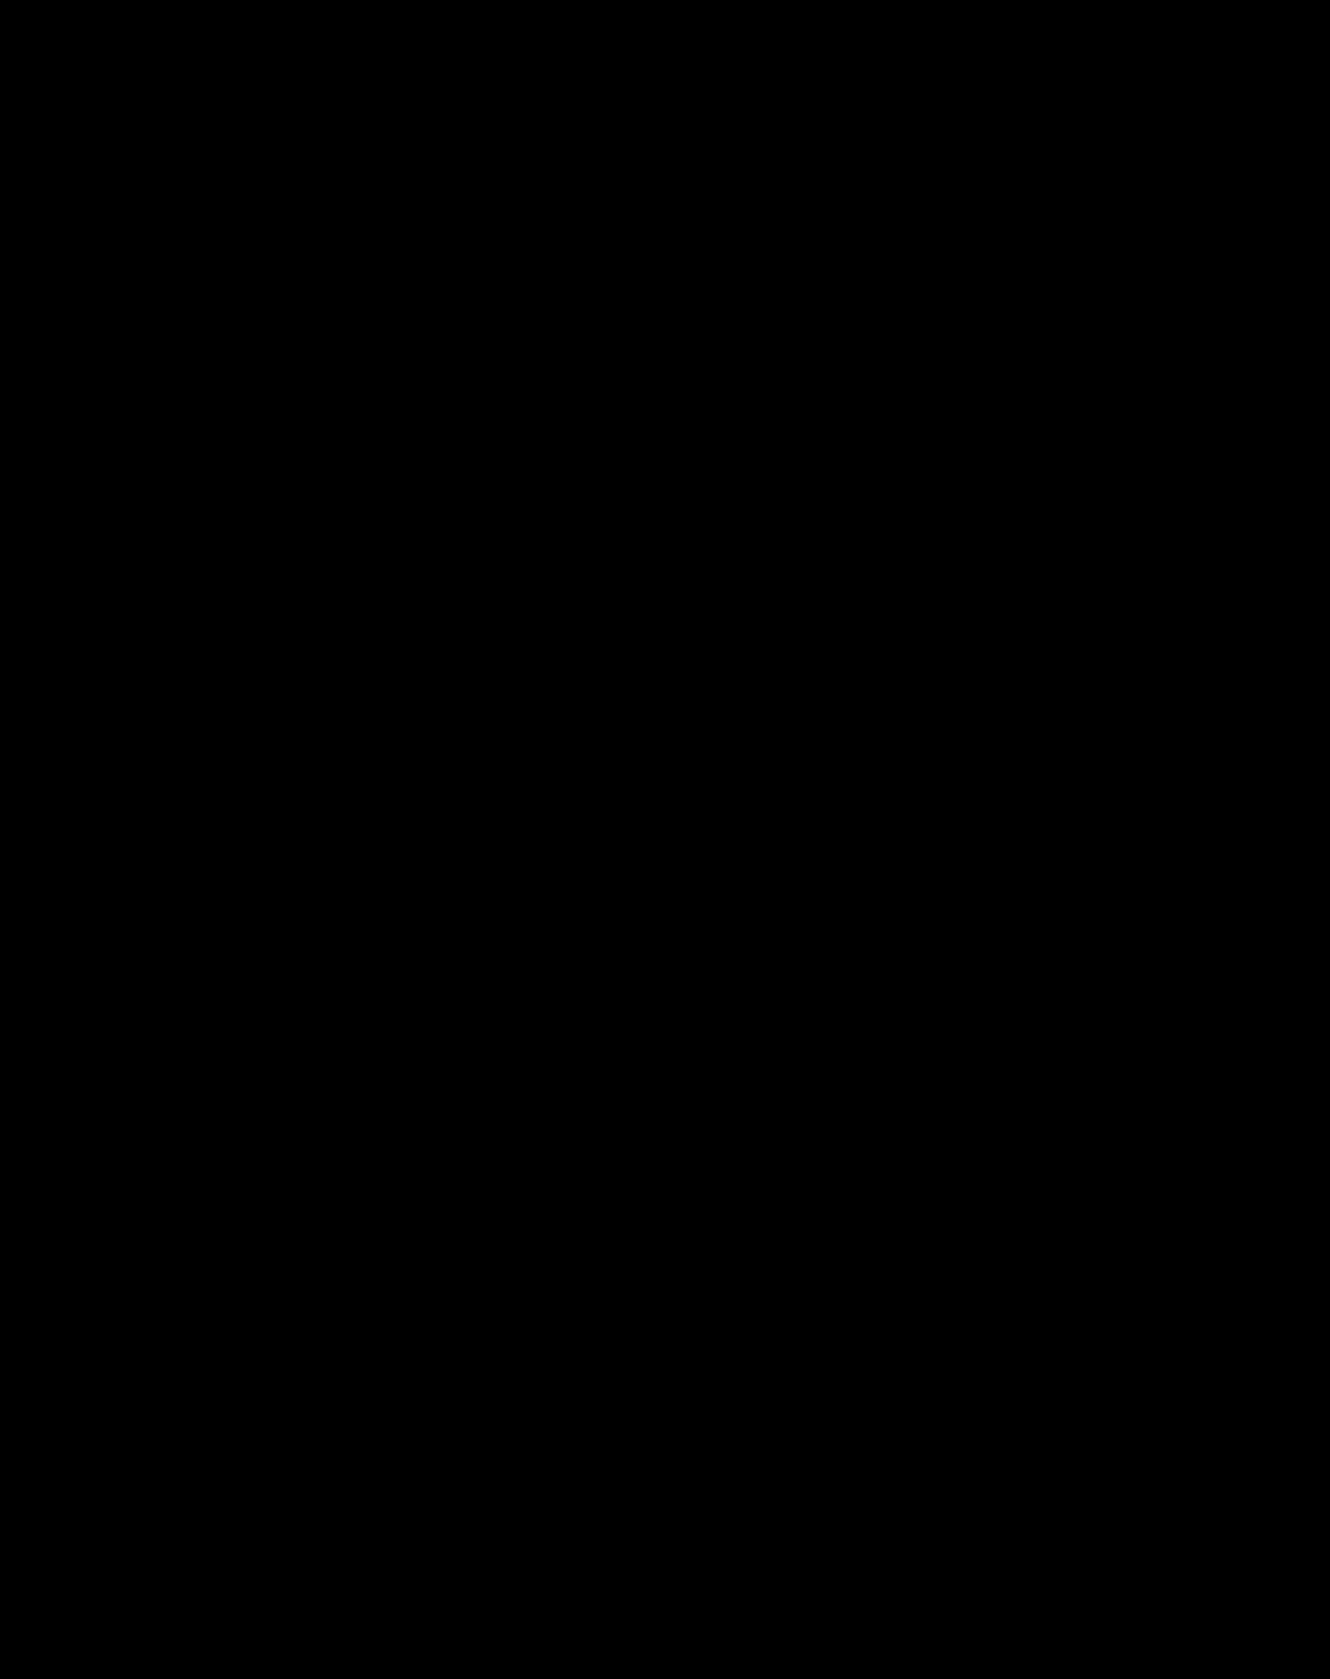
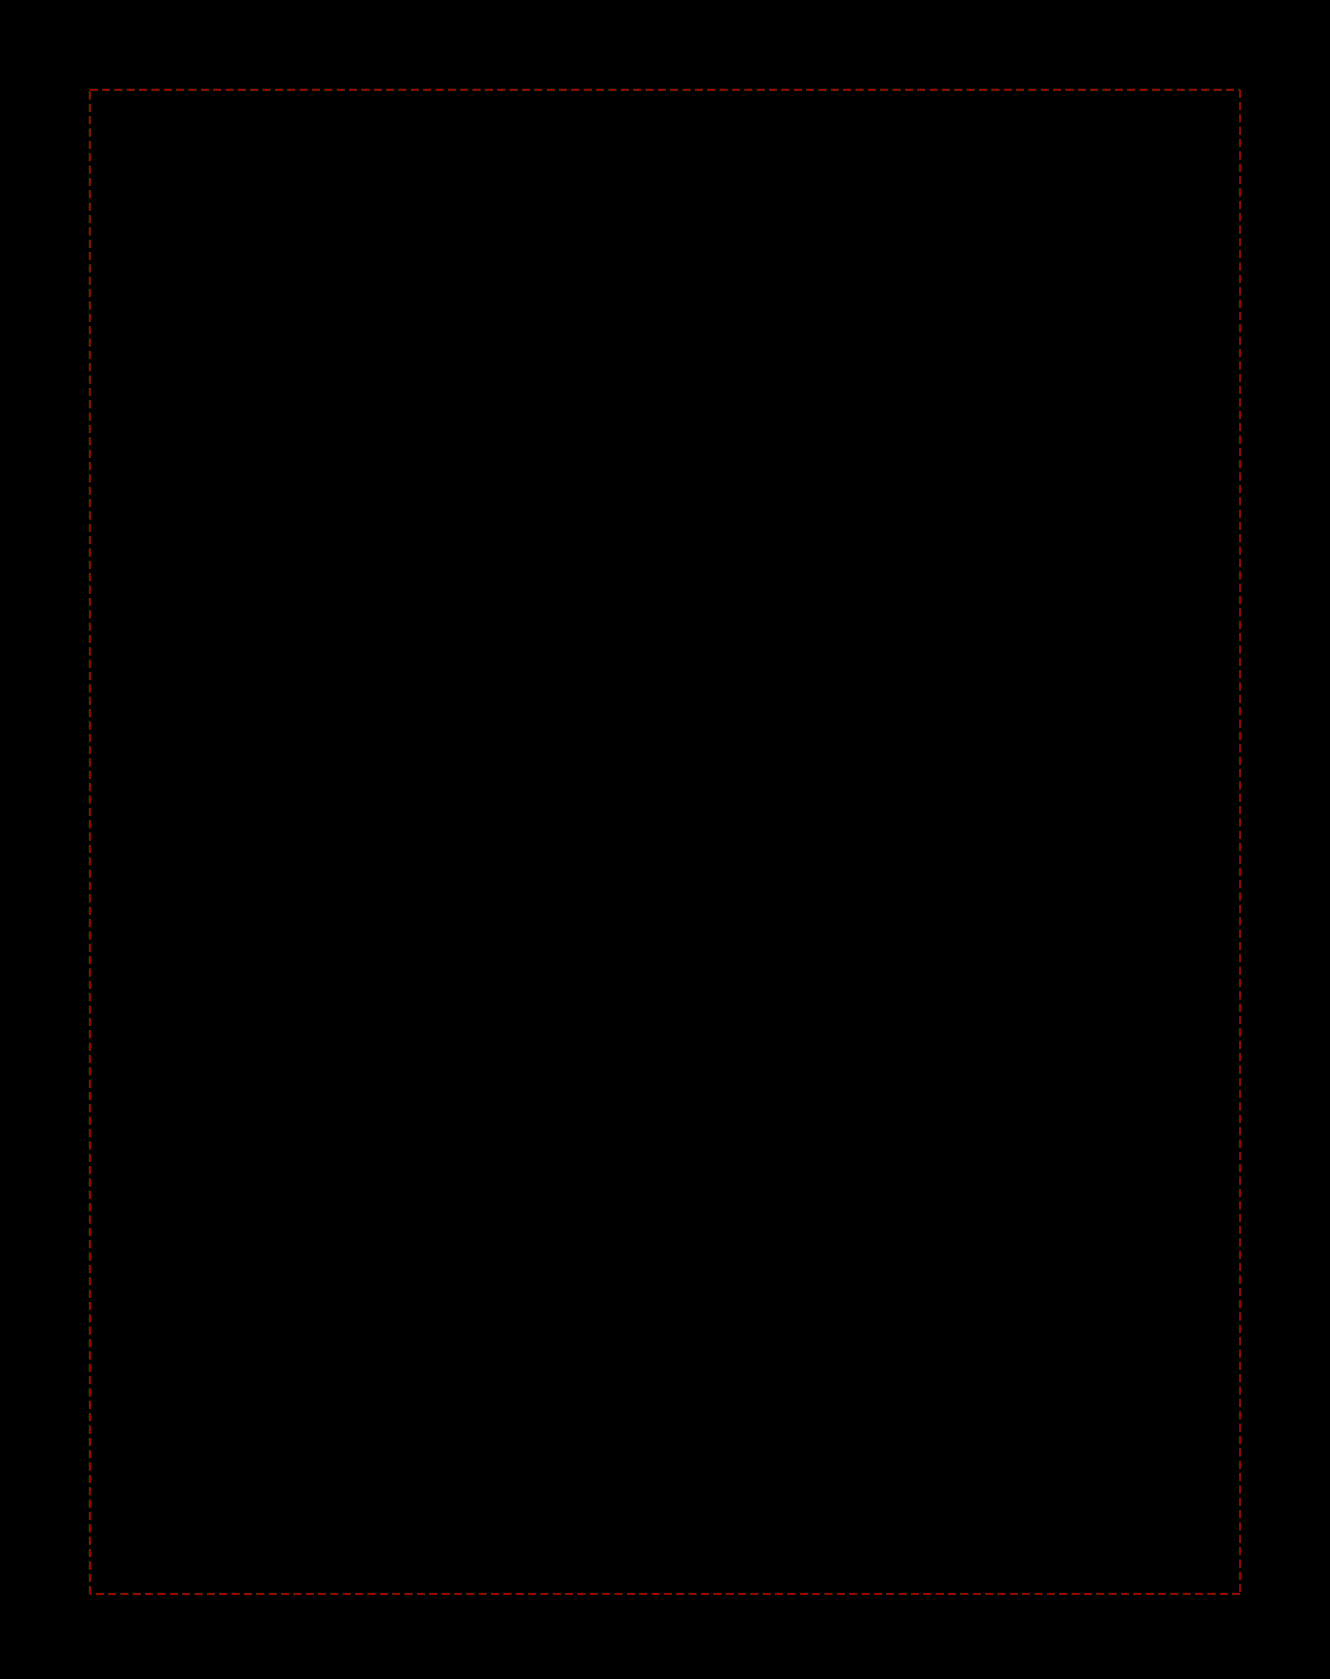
top zone outline: none -> (89, 89) (90, 1594) (1239, 1593) (1239, 89) (89, 89)

